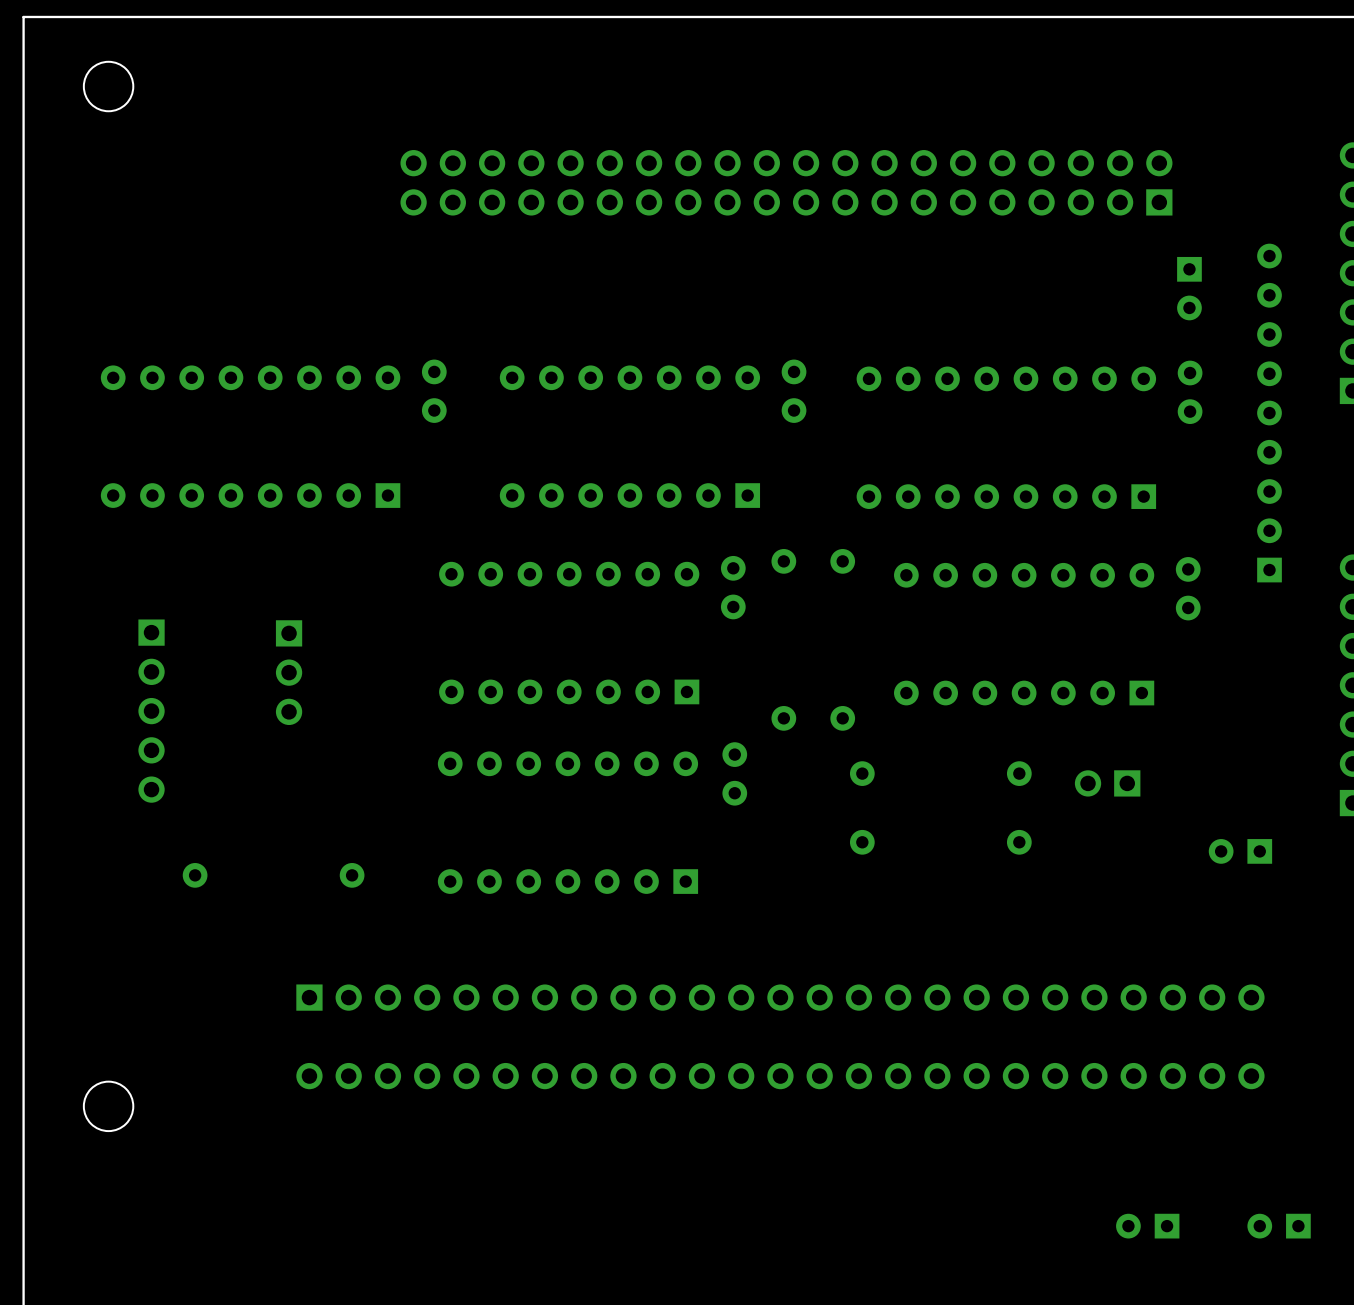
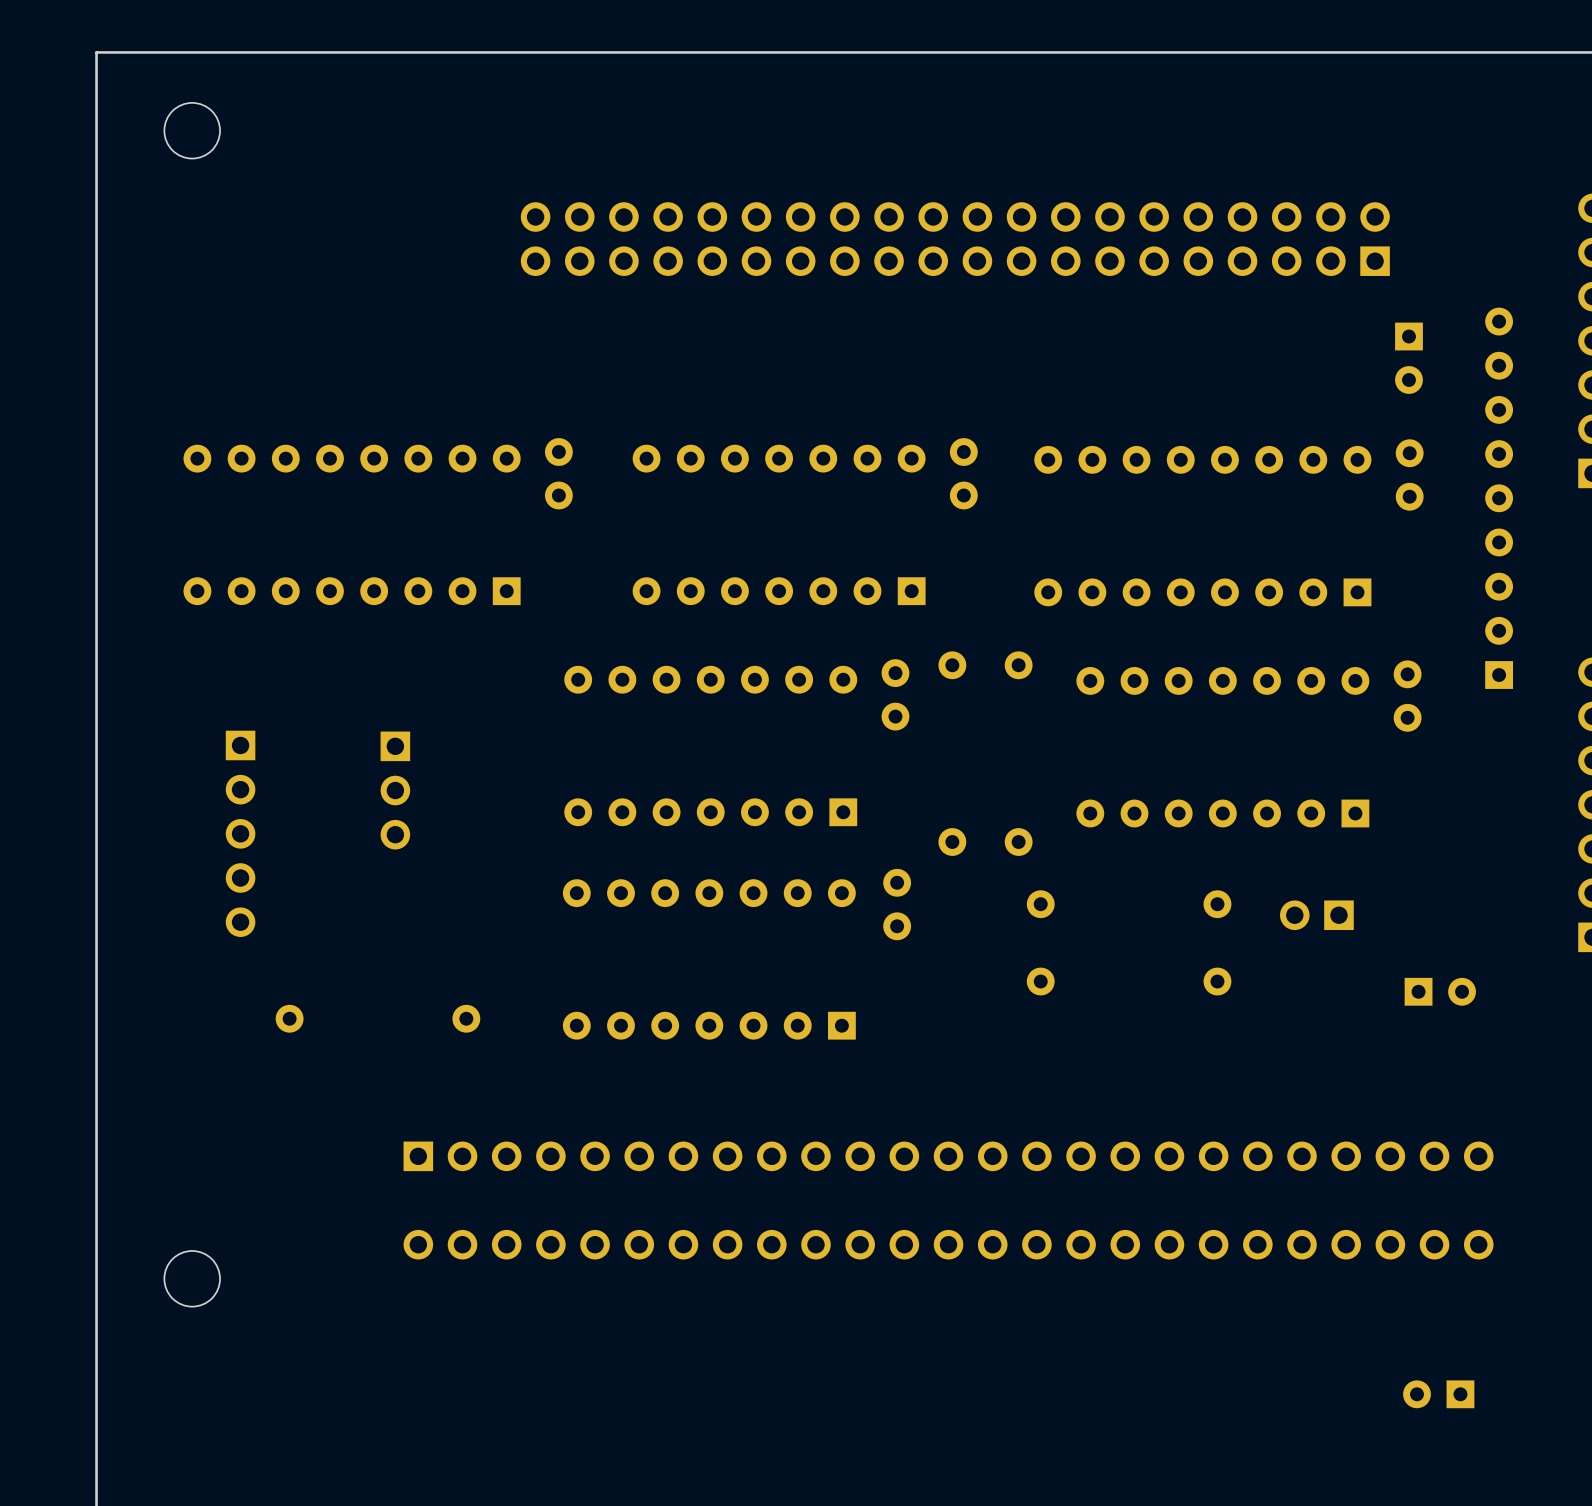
part rotation: 0° (1240, 851) -> 180° (1440, 991)
part: none -> (1438, 1394)
part: (1147, 1226) -> none
part: (1279, 1226) -> none

